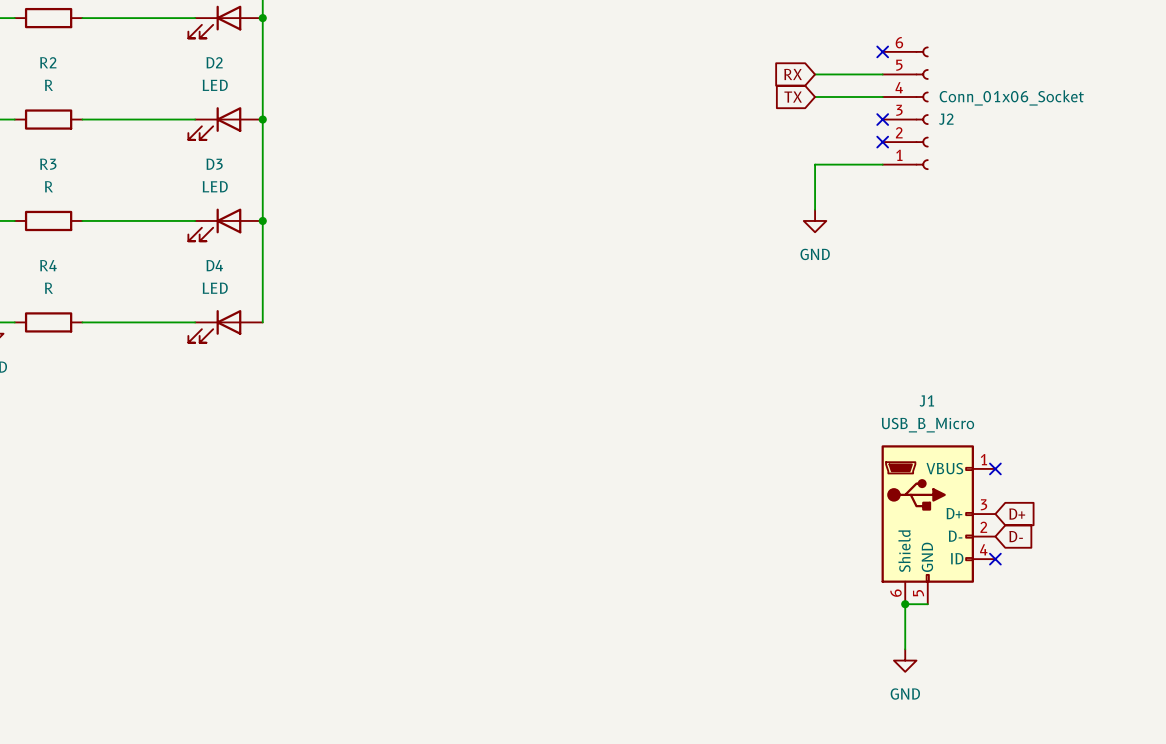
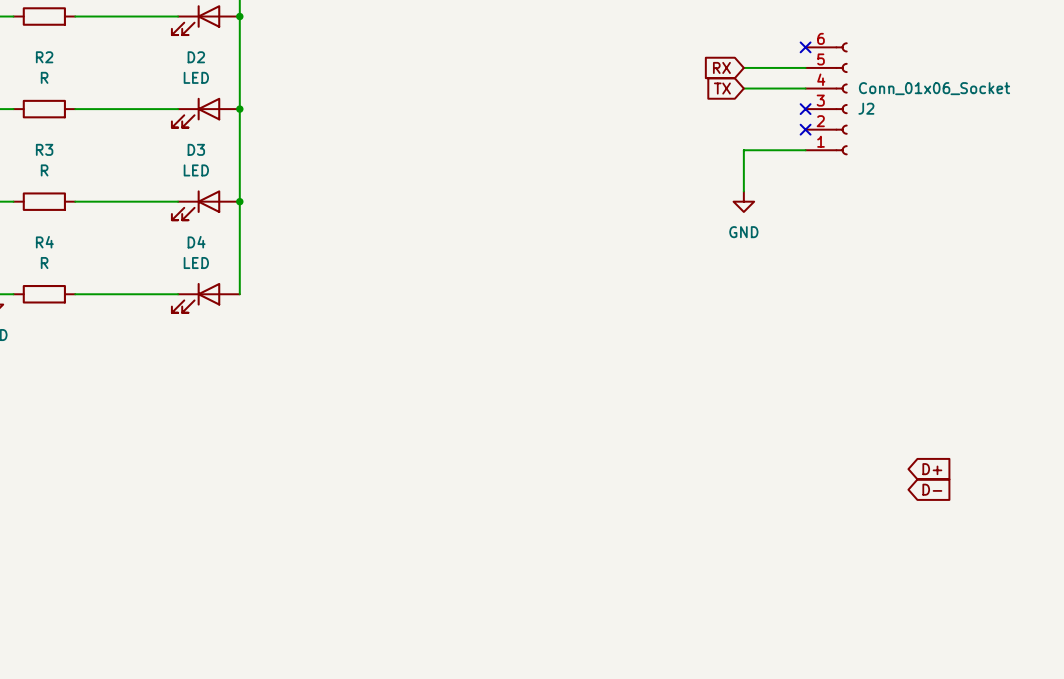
no-connect mark: (995, 468) -> none
J1: USB_B_Micro (938, 524) -> none
no-connect mark: (995, 559) -> none
junction: (905, 604) -> none
wire: (927, 604) (905, 604) (905, 649) -> none
power symbol: GND (905, 660) -> none

